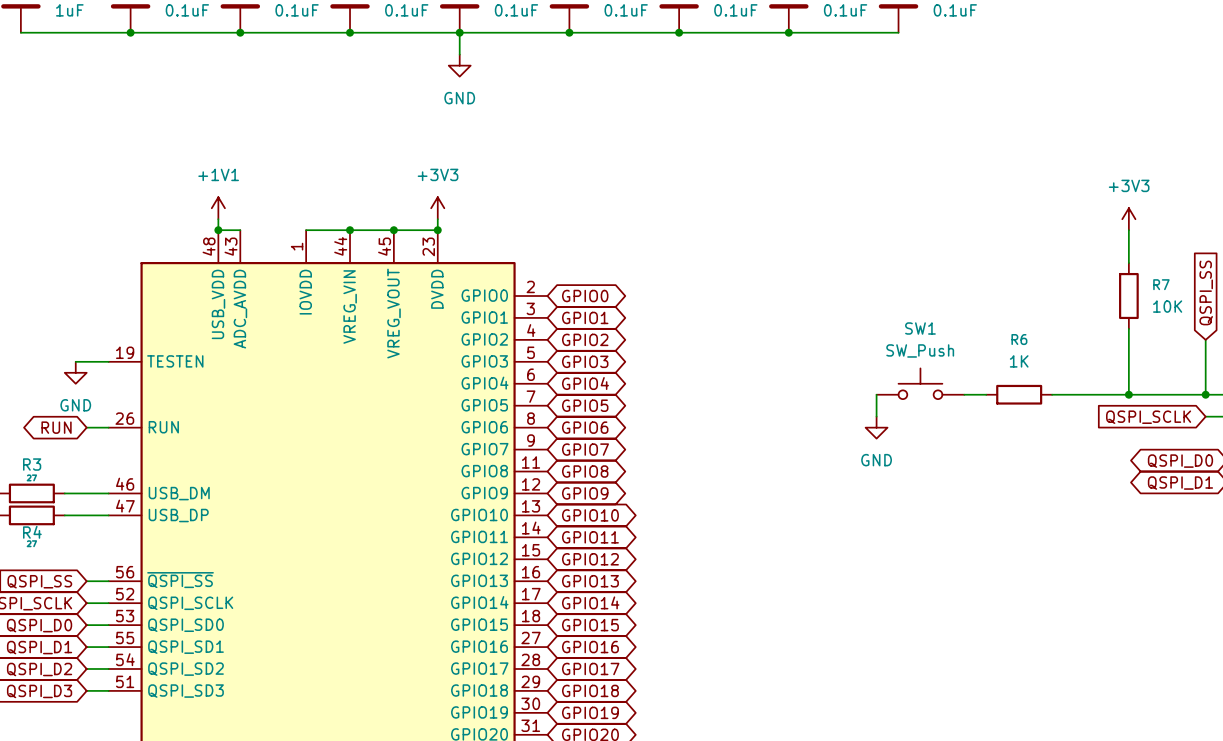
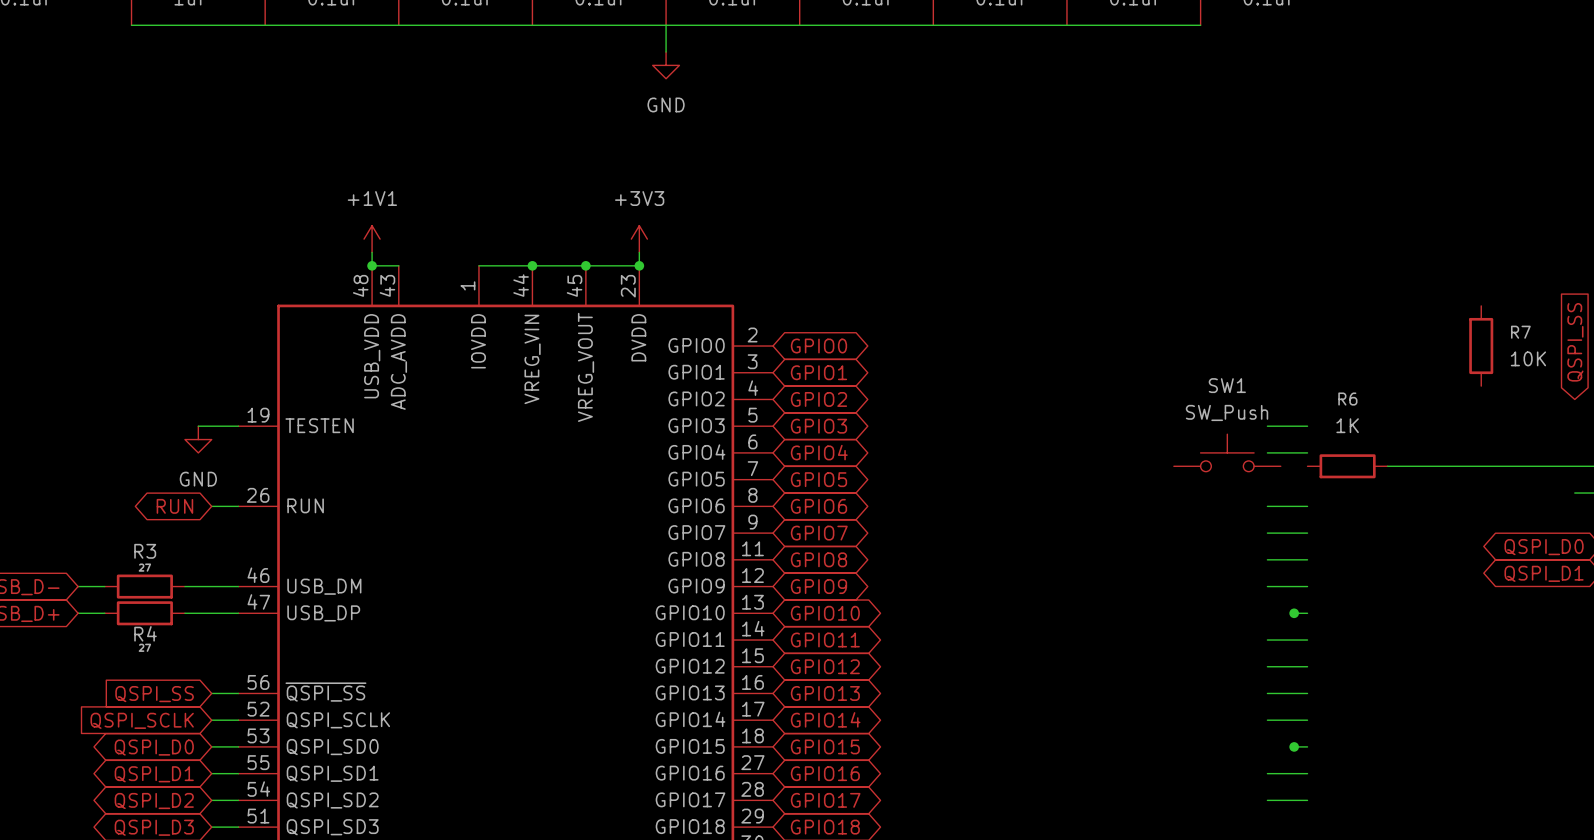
junction: (130, 32) -> none
junction: (240, 32) -> none
junction: (350, 32) -> none
junction: (459, 32) -> none
junction: (569, 32) -> none
junction: (679, 32) -> none
junction: (788, 32) -> none
power symbol: +3V3 (1128, 219) -> none
wire: (1128, 230) (1128, 263) -> none
wire: (1128, 328) (1128, 394) -> none
wire: (1205, 339) (1205, 394) -> none
wire: none -> (1267, 426) (1307, 426)
wire: none -> (1267, 452) (1307, 452)
wire: (876, 394) (876, 416) -> none
wire: (964, 394) (986, 394) -> none
junction: (1128, 394) -> none
junction: (1205, 394) -> none
global label: QSPI_SCLK (1148, 417) -> none
power symbol: GND (876, 427) -> none
wire: none -> (1267, 506) (1307, 506)
wire: none -> (1267, 533) (1307, 533)
wire: none -> (1267, 559) (1307, 559)
wire: none -> (1267, 586) (1307, 586)
wire: none -> (1294, 613) (1307, 613)
junction: none -> (1294, 613)
wire: none -> (1267, 640) (1307, 640)
wire: none -> (1267, 666) (1307, 666)
wire: none -> (1267, 693) (1307, 693)
wire: none -> (1267, 720) (1307, 720)
wire: none -> (1294, 746) (1307, 746)
junction: none -> (1294, 746)
wire: none -> (1267, 773) (1307, 773)
wire: none -> (1267, 800) (1307, 800)

